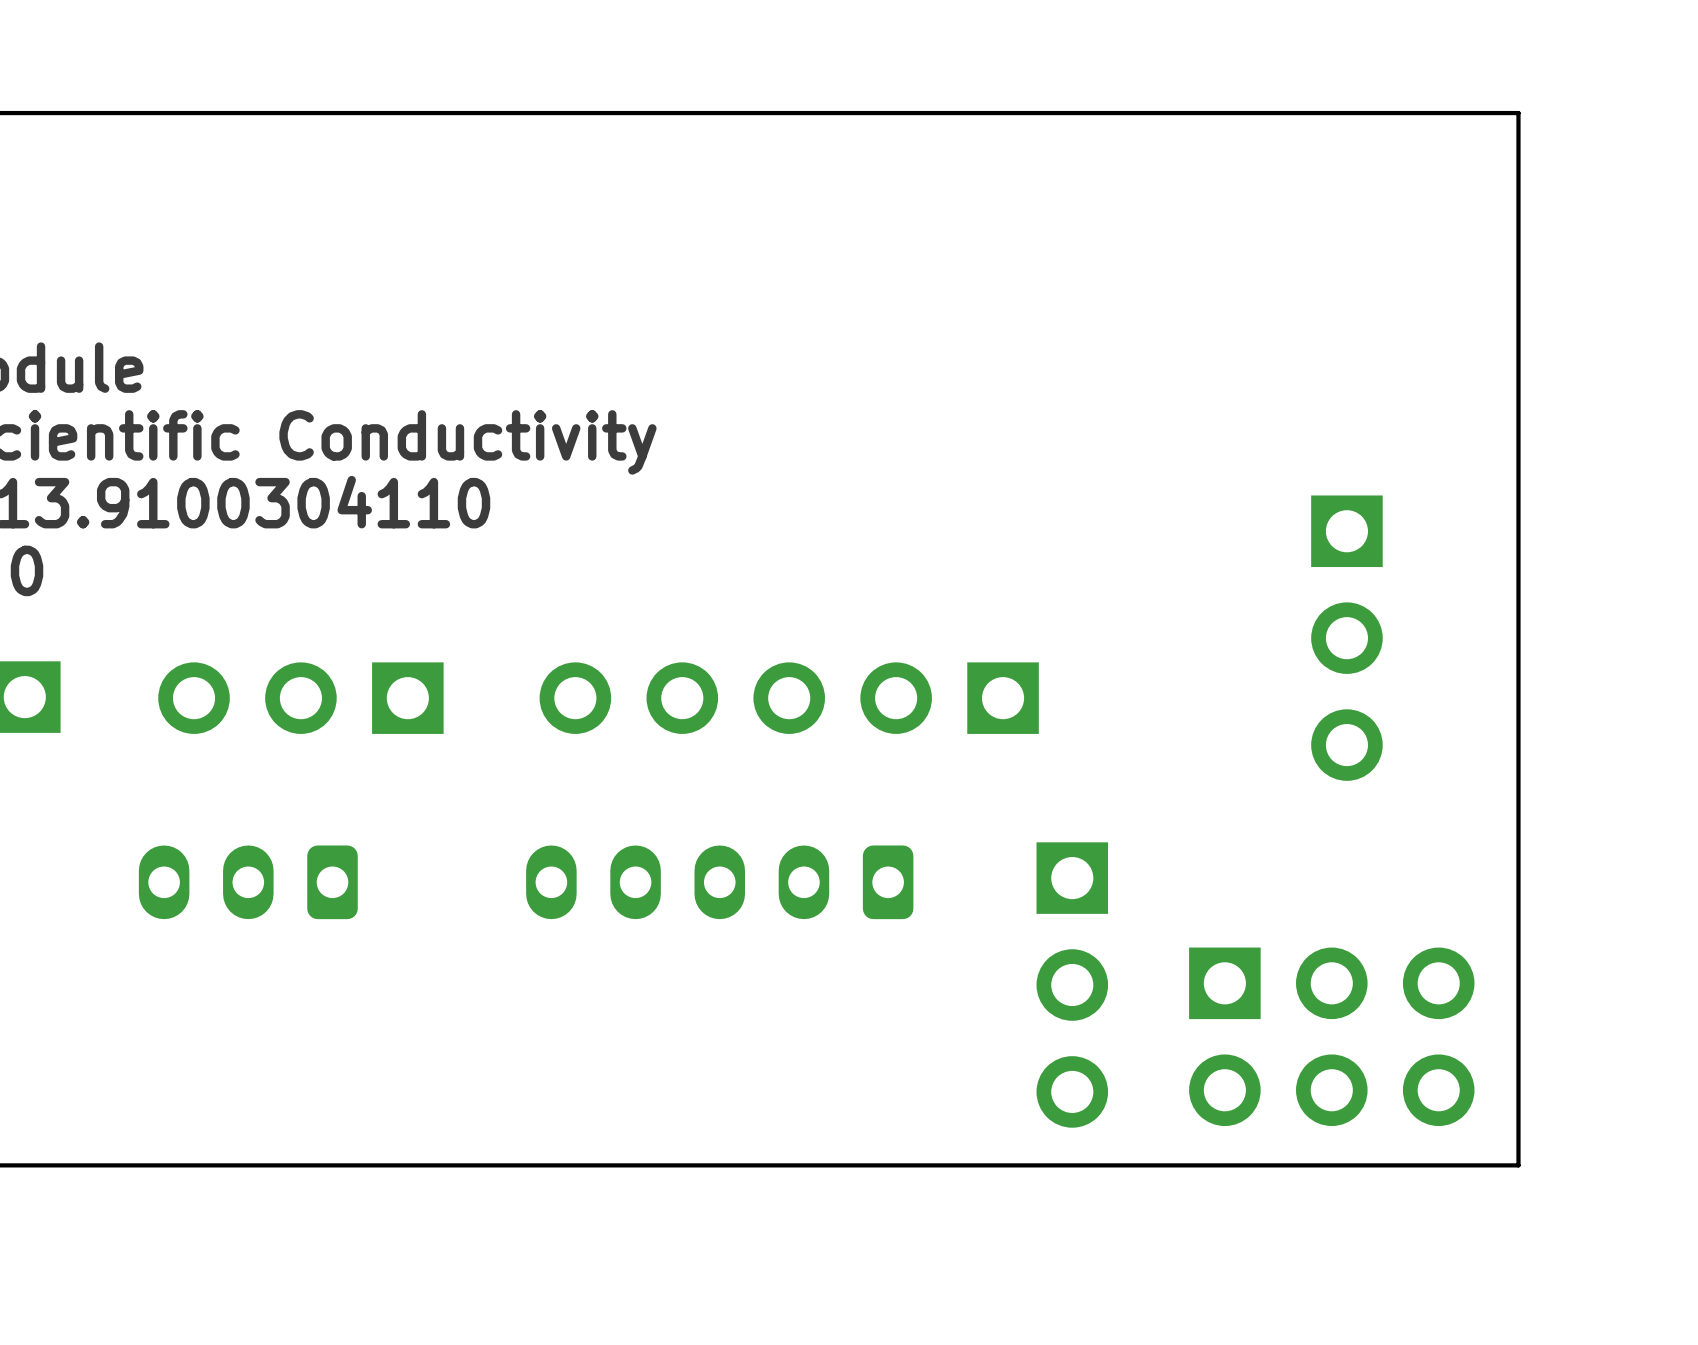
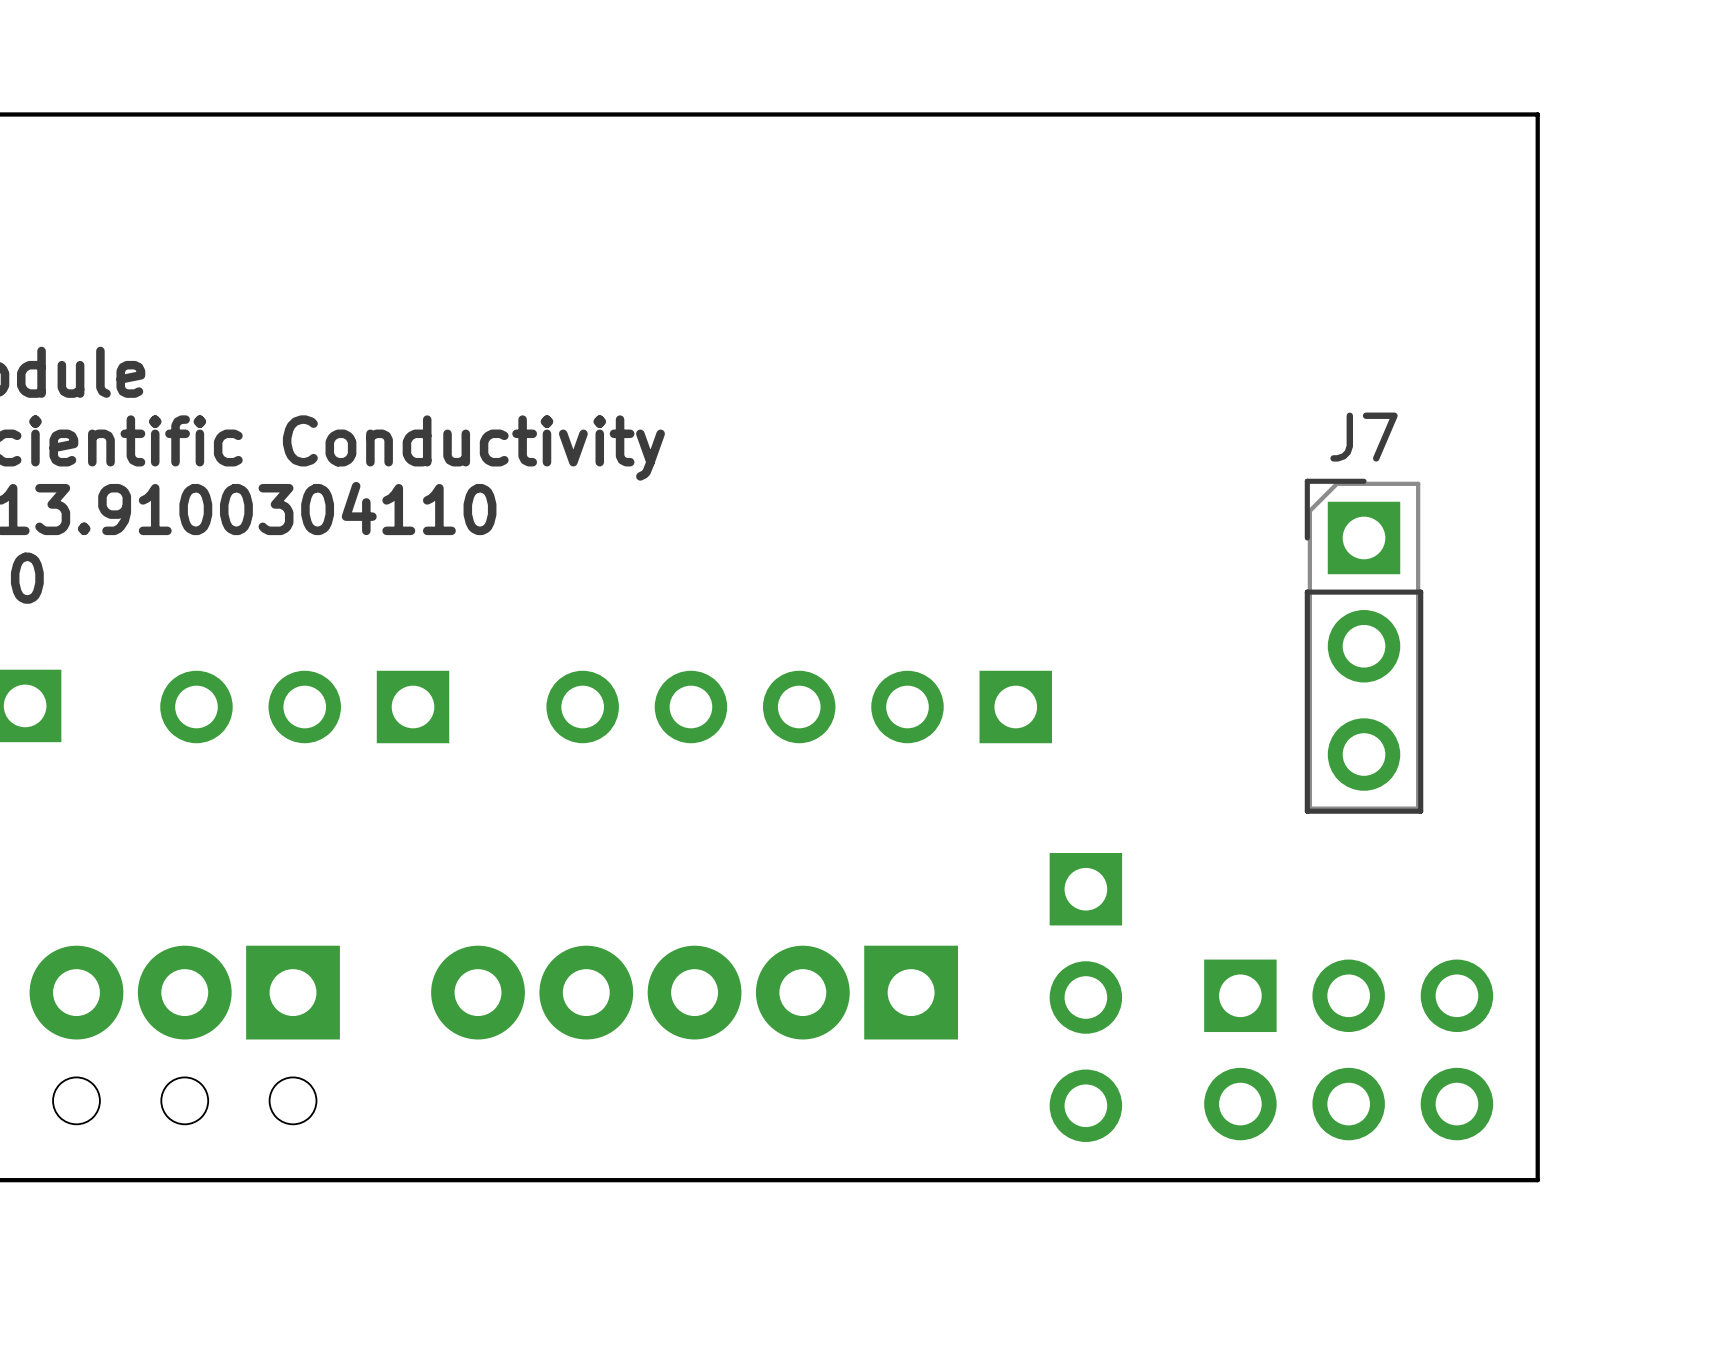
J7 side: top (1346, 638) -> bottom (1364, 646)
part: (248, 882) -> none
part: (719, 882) -> none
part: none -> (694, 992)
part: none -> (184, 1035)

